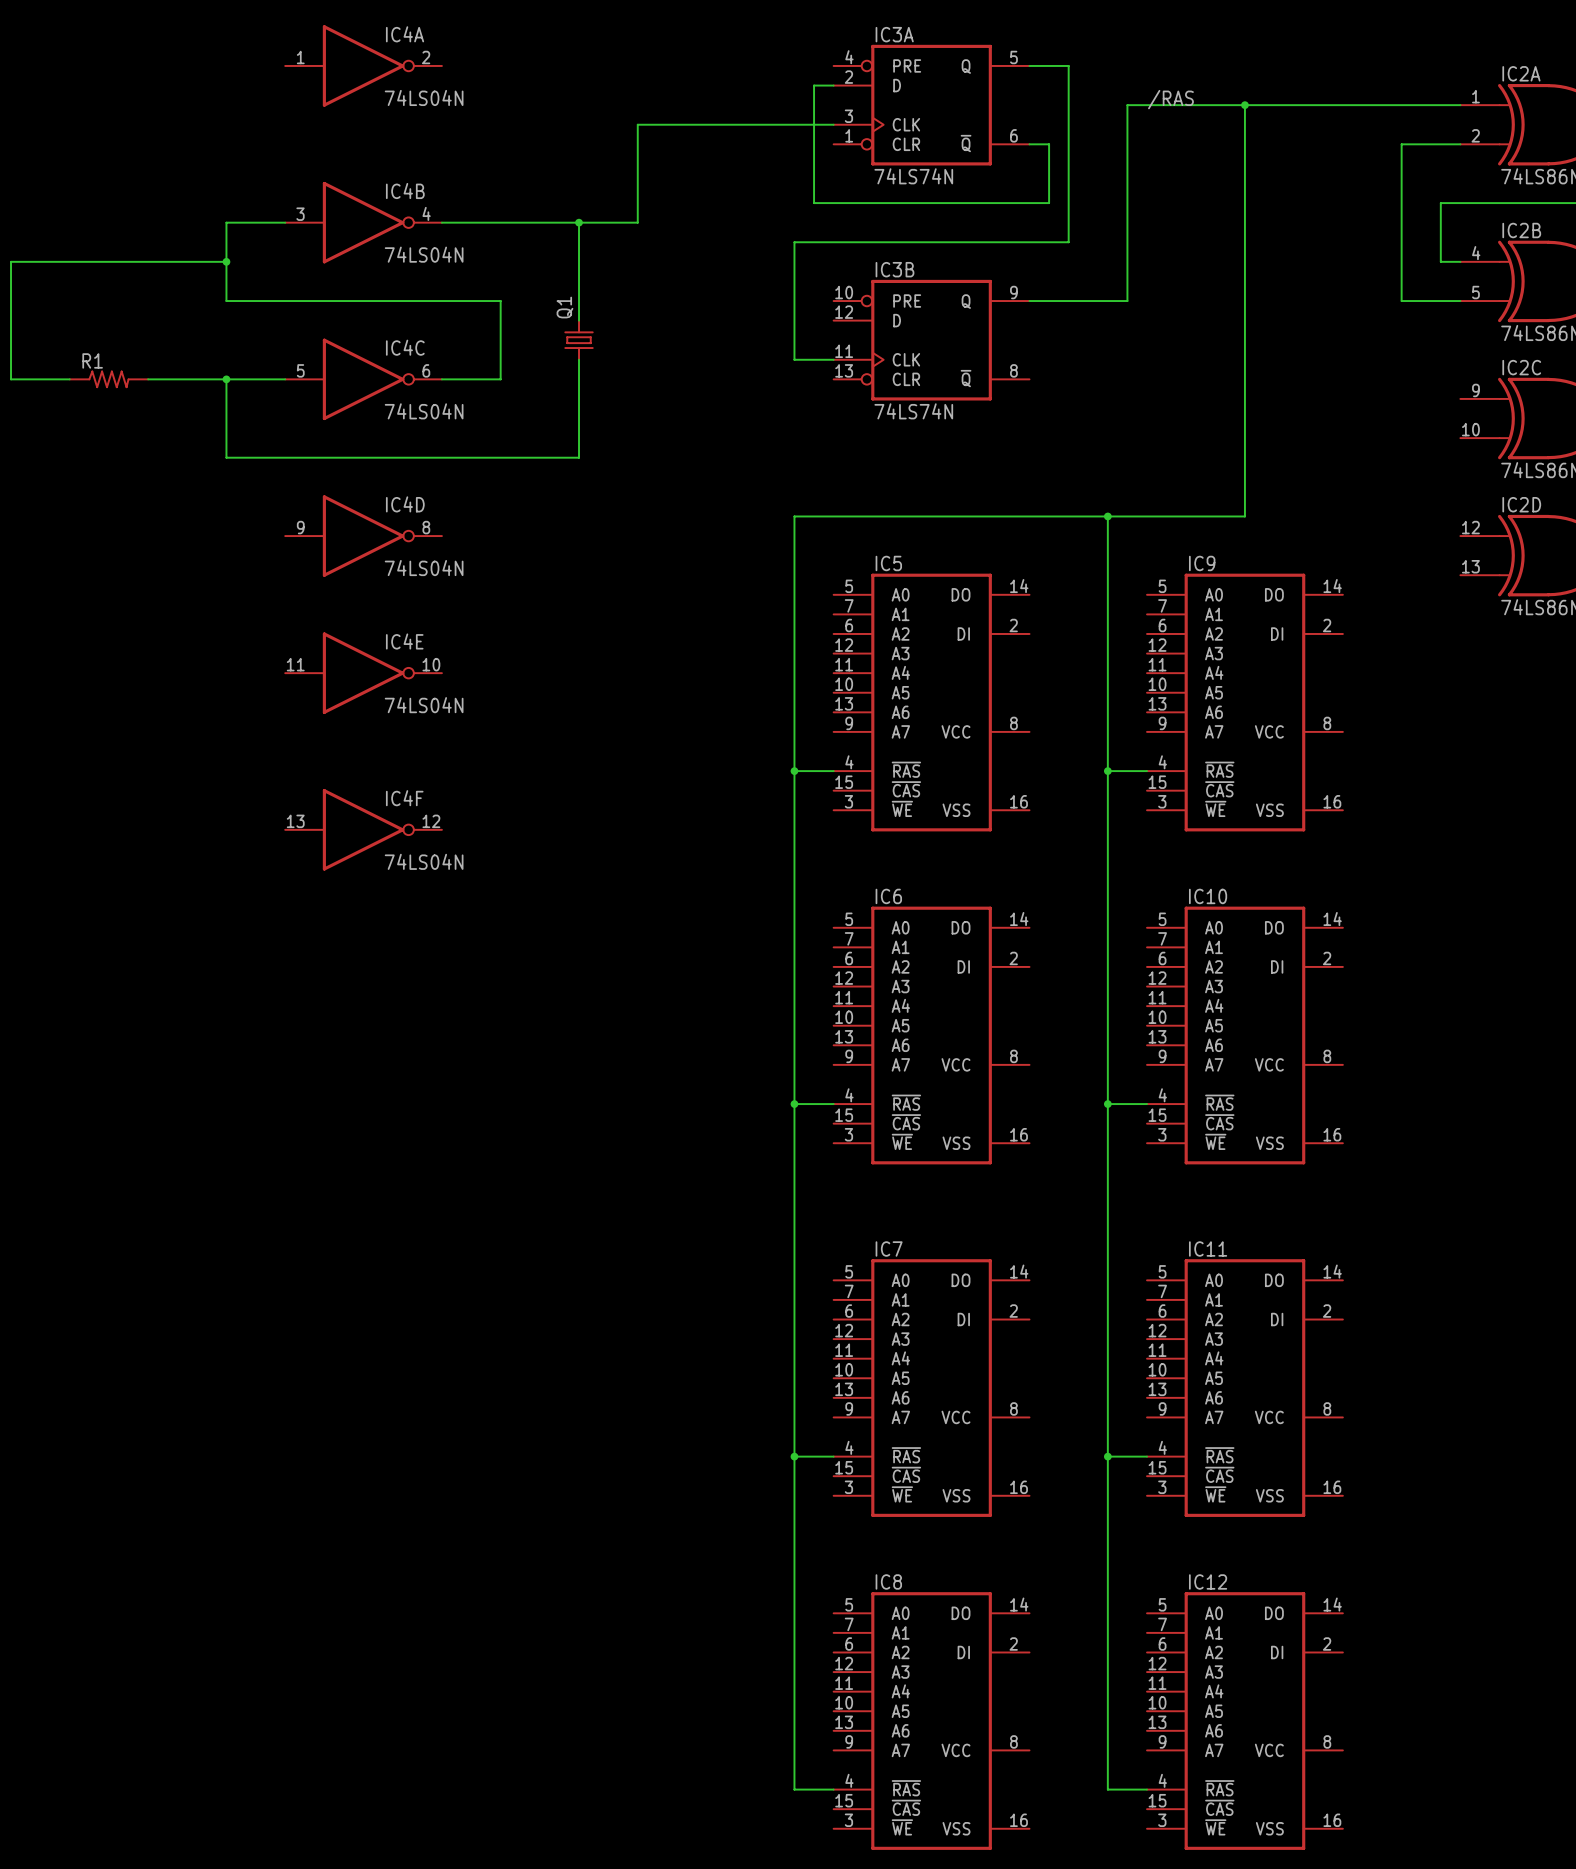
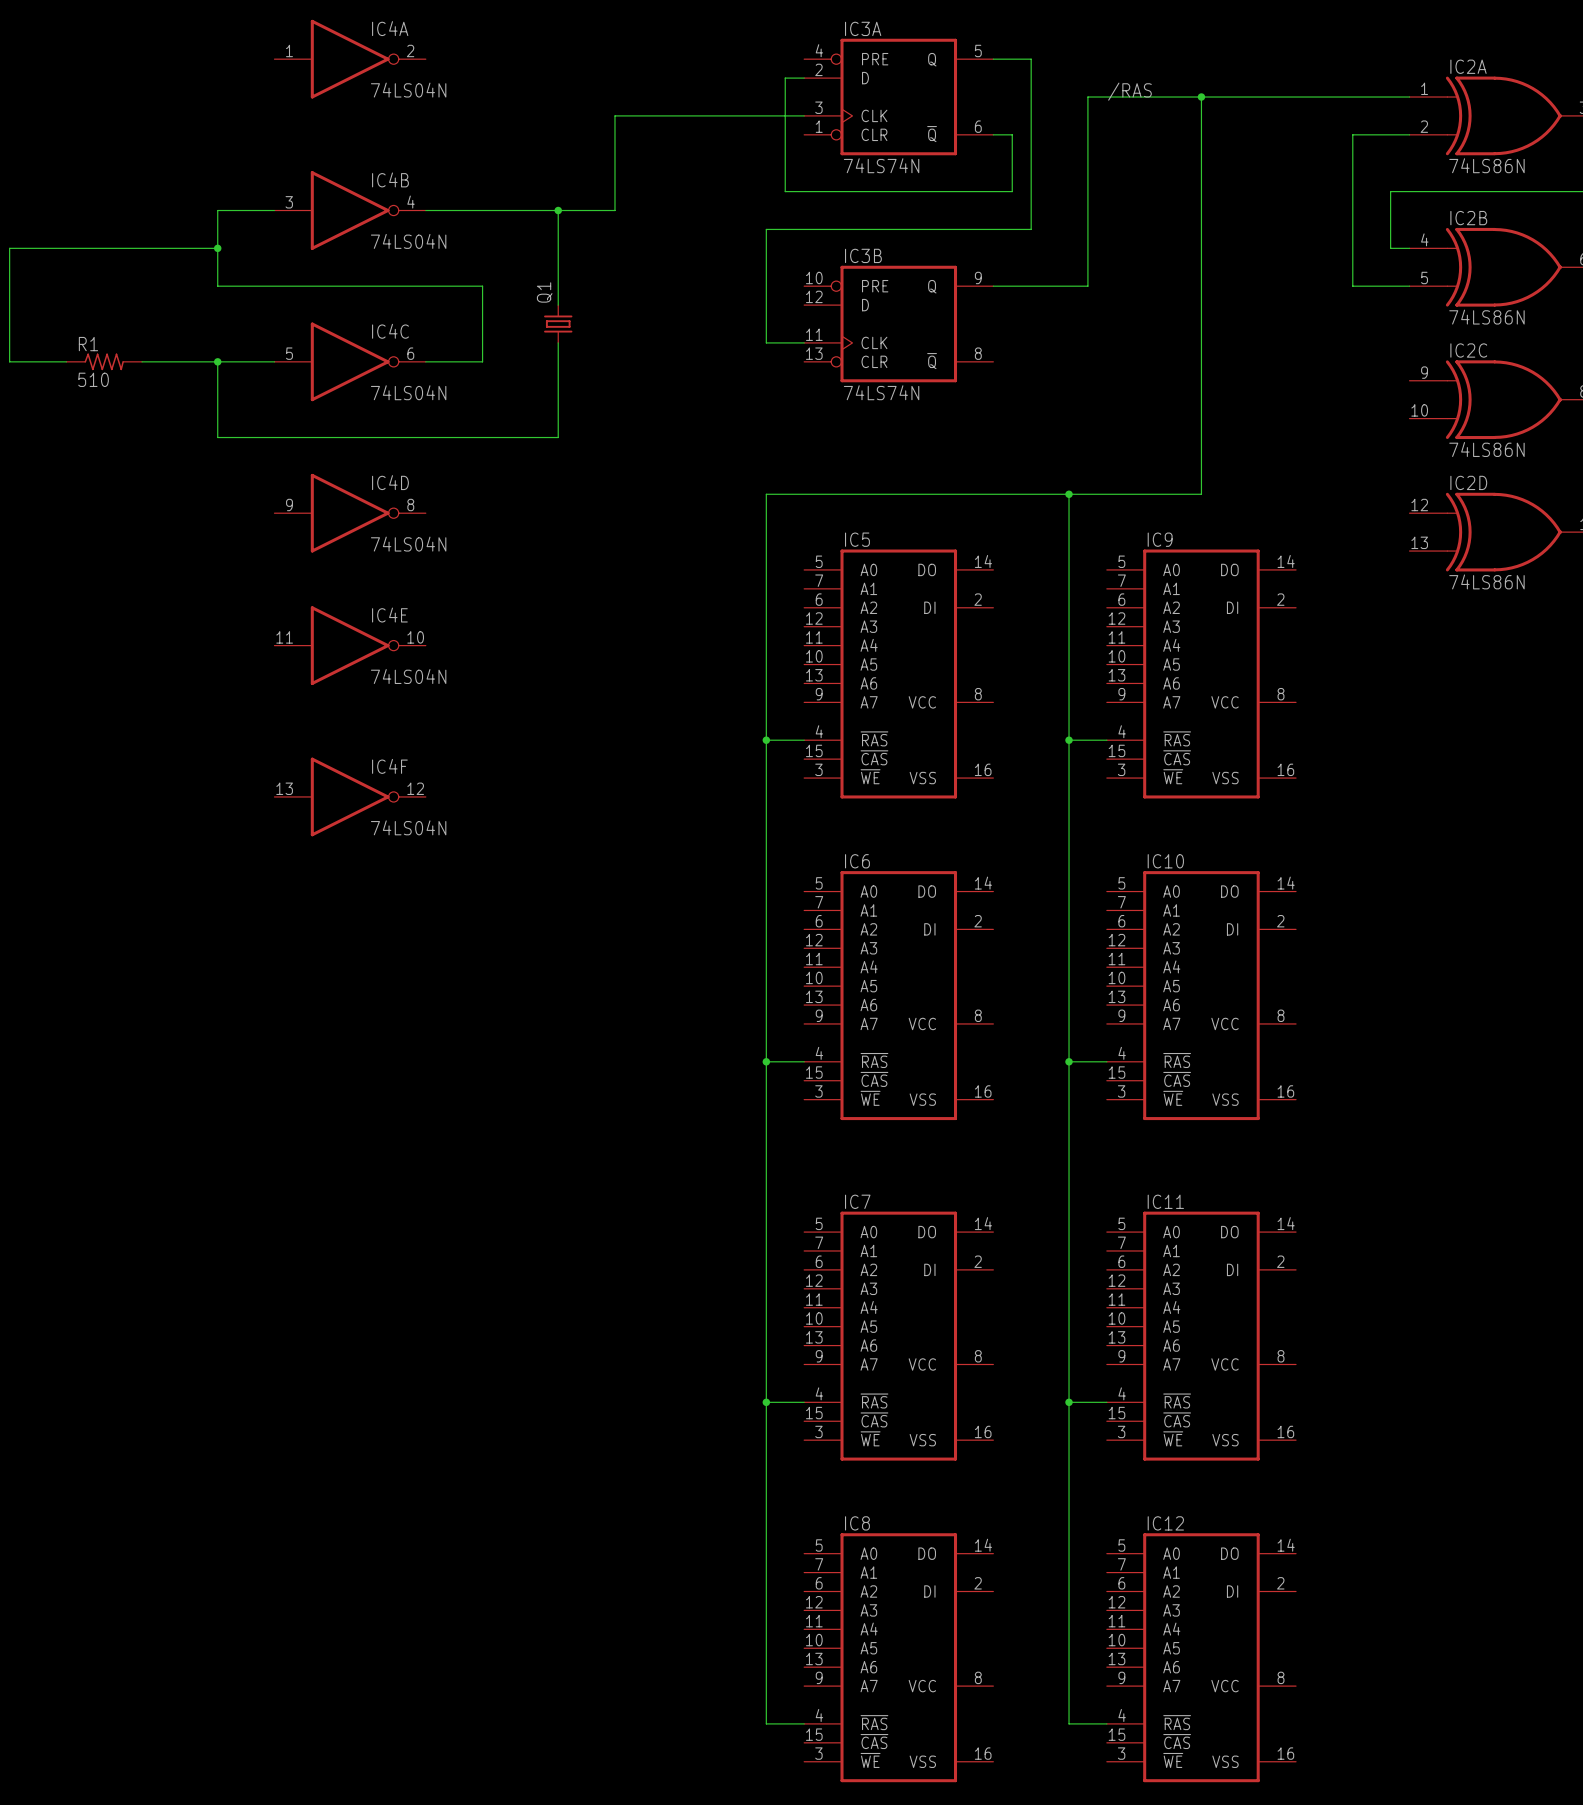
R1 value: none -> 510 (93, 379)

